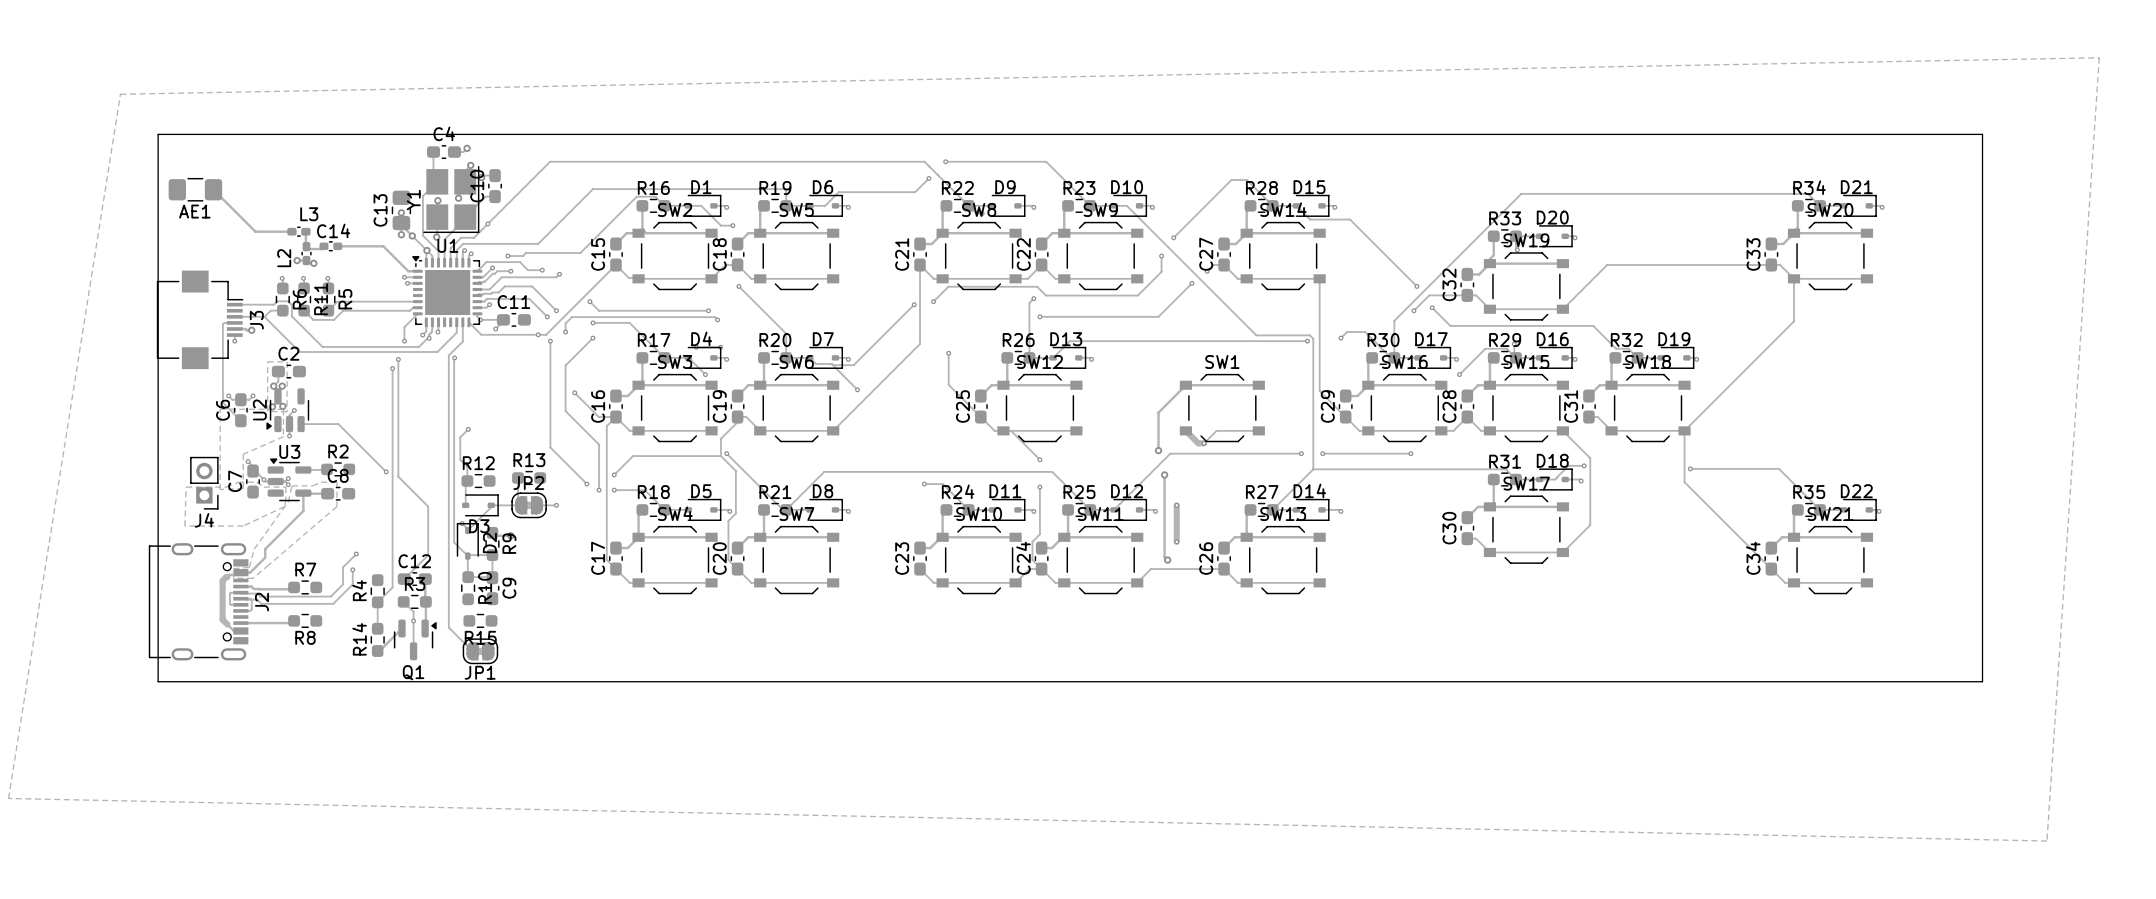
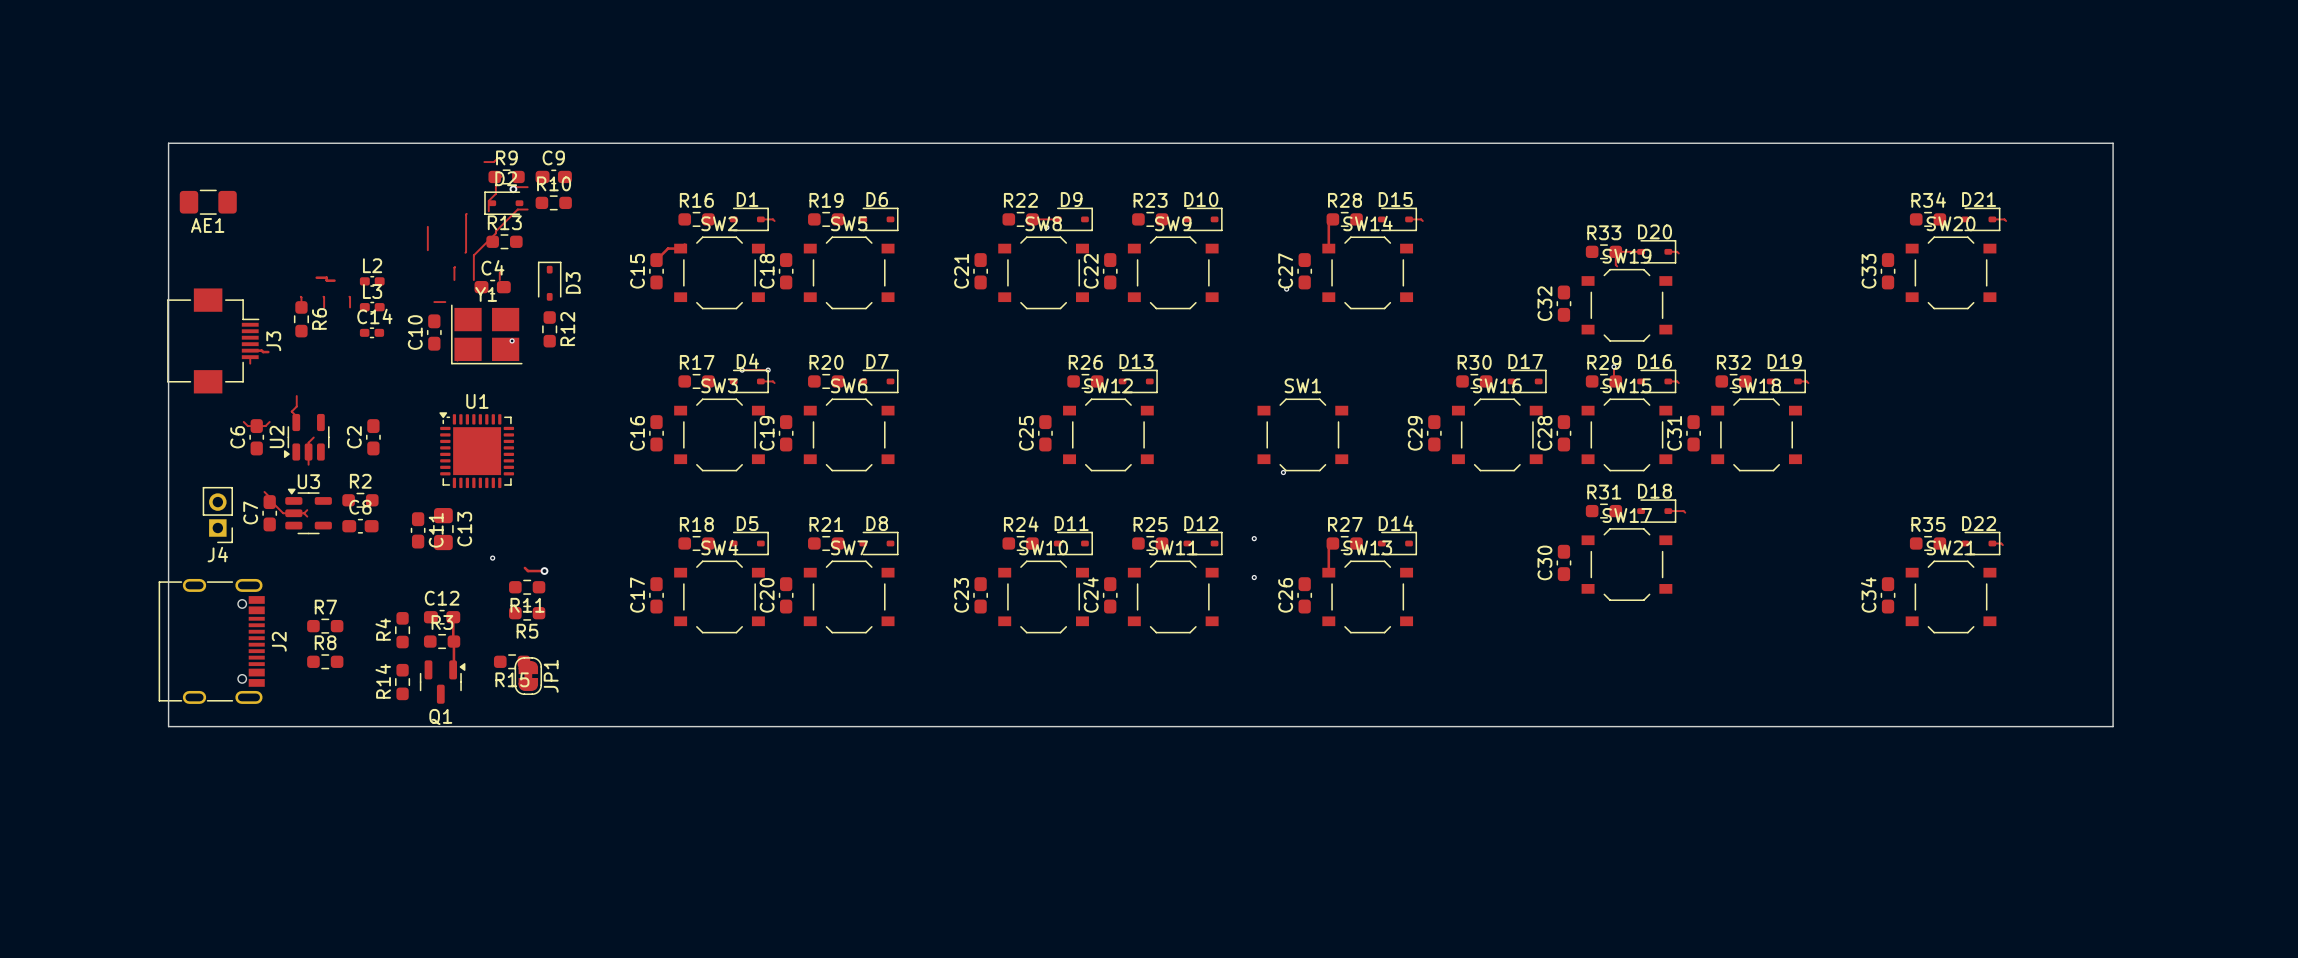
zone outline: (2099, 57) (120, 94) (8, 798) (2046, 841) (2099, 57) -> none
via: (467, 148) -> none
track: (433, 152) (433, 178) (437, 181) (422, 196) (422, 235) (438, 251) (438, 262) -> none
C4 position: (443, 152) -> (492, 287)
track: (945, 161) (1046, 161) (1090, 205) (1126, 205) (1256, 335) (1309, 335) (1313, 338) (1313, 469) -> none
via: (945, 161) -> none
via: (470, 165) -> none
track: (928, 178) (915, 192) (838, 192) (825, 205) (786, 205) (786, 190) (784, 189) (592, 189) (538, 243) (463, 243) (456, 250) (456, 262) -> none
via: (928, 178) -> none
C10 position: (495, 186) -> (434, 332)
track: (213, 189) (255, 231) (291, 231) -> none
via: (458, 198) -> none
Y1 rotation: 0° (451, 199) -> 90° clockwise (486, 334)
Y1 position: (451, 199) -> (486, 334)
via: (437, 200) -> none
track: (642, 205) (642, 229) (646, 233) (711, 233) -> none
track: (764, 205) (760, 209) (760, 233) -> none
track: (835, 205) (848, 207) -> none
track: (946, 205) (942, 209) (942, 233) -> none
track: (1017, 205) (1033, 207) -> none
track: (1068, 205) (1064, 209) (1064, 233) -> none
track: (1139, 205) (1152, 207) -> none
track: (1797, 205) (1797, 227) (1793, 233) -> none
track: (1843, 205) (1820, 205) (1808, 193) (1521, 193) (1394, 320) (1394, 357) -> none
via: (726, 207) -> none
via: (848, 207) -> none
via: (1033, 207) -> none
via: (1152, 207) -> none
via: (1334, 207) -> none
via: (1882, 207) -> none
C13 name position: C13 (380, 210) -> C13 (464, 529)
C13 position: (401, 210) -> (443, 529)
via: (401, 212) -> none
track: (982, 213) (976, 213) (924, 161) (550, 161) (474, 237) (461, 237) (450, 248) (450, 262) -> none
L3 name position: L3 (309, 214) -> L3 (372, 291)
via: (487, 223) -> none
track: (401, 225) (432, 256) (432, 262) -> none
track: (732, 225) (720, 225) (701, 205) (664, 205) (655, 196) (636, 196) (580, 252) (526, 252) (523, 256) (507, 256) -> none
via: (732, 225) -> none
L3 position: (298, 231) -> (372, 307)
track: (305, 231) (305, 244) (308, 249) (321, 249) (323, 246) -> none
track: (833, 233) (748, 233) (737, 244) -> none
track: (942, 233) (1015, 233) -> none
track: (942, 233) (931, 244) (920, 244) -> none
track: (1137, 233) (1052, 233) (1041, 244) -> none
track: (1319, 233) (1246, 233) (1235, 244) (1224, 244) -> none
track: (1793, 233) (1866, 233) -> none
track: (1793, 233) (1783, 244) (1771, 244) -> none
via: (401, 234) -> none
via: (412, 235) -> none
track: (1493, 236) (1493, 255) (1489, 259) (1489, 263) -> none
via: (436, 237) -> none
track: (1173, 237) (1231, 180) (1246, 180) (1272, 205) (1296, 205) (1310, 219) (1350, 219) (1416, 286) -> none
via: (1173, 237) -> none
via: (1575, 237) -> none
C14 position: (330, 246) -> (372, 332)
track: (337, 246) (383, 246) (408, 271) (417, 271) -> none
via: (1517, 249) -> none
via: (426, 250) -> none
track: (464, 250) (462, 252) (462, 262) -> none
via: (464, 250) -> none
L2 rotation: 0° (306, 253) -> 90° clockwise (372, 281)
L2 position: (306, 253) -> (372, 281)
via: (471, 253) -> none
via: (507, 256) -> none
track: (1161, 256) (1161, 271) (1137, 295) (1046, 295) (1037, 286) (948, 286) (933, 301) -> none
via: (1161, 256) -> none
via: (297, 260) -> none
via: (313, 263) -> none
track: (1489, 263) (1479, 274) (1467, 274) -> none
track: (1489, 263) (1562, 263) -> none
track: (492, 267) (483, 277) (477, 277) -> none
via: (492, 267) -> none
track: (542, 270) (528, 270) (519, 262) (486, 262) (477, 271) -> none
via: (542, 270) -> none
track: (510, 271) (497, 271) (484, 281) (477, 283) -> none
via: (510, 271) -> none
track: (1207, 271) (1213, 264) (1224, 264) (1237, 278) (1319, 278) (1319, 390) (1359, 430) (1453, 430) (1467, 417) (1481, 430) (1562, 430) (1590, 458) (1590, 525) (1562, 552) (1489, 552) (1476, 538) (1467, 538) -> none
track: (559, 274) (556, 277) (501, 277) (489, 289) (477, 289) -> none
via: (559, 274) -> none
track: (404, 277) (417, 277) -> none
via: (404, 277) -> none
via: (282, 278) -> none
via: (303, 278) -> none
via: (327, 278) -> none
track: (833, 278) (751, 278) (737, 264) (725, 264) (711, 278) (638, 278) (628, 277) (615, 264) (546, 334) (481, 334) (468, 322) -> none
track: (1137, 278) (1055, 278) (1041, 264) (1027, 278) (933, 278) (920, 264) (920, 344) (833, 430) (760, 430) (746, 417) (737, 417) (737, 422) (720, 438) (720, 456) -> none
track: (1793, 278) (1866, 278) -> none
track: (1793, 278) (1793, 321) (1684, 430) -> none
track: (1793, 278) (1780, 264) (1607, 264) (1562, 309) (1489, 309) (1476, 295) (1429, 295) (1413, 310) -> none
via: (407, 283) -> none
track: (1191, 283) (1158, 316) (1039, 316) -> none
via: (1191, 283) -> none
track: (738, 286) (786, 333) (786, 357) (809, 357) (816, 363) (831, 363) (857, 389) -> none
via: (738, 286) -> none
via: (1416, 286) -> none
U1 position: (447, 291) -> (476, 450)
track: (477, 295) (498, 292) (504, 286) (532, 286) (556, 310) -> none
track: (1033, 298) (1029, 302) (1029, 357) (1053, 357) (1069, 341) (1307, 341) -> none
via: (1033, 298) -> none
R11 rotation: 0° (304, 299) -> 90° clockwise (527, 587)
R11 position: (304, 299) -> (527, 587)
R5 rotation: 0° (328, 299) -> 90° clockwise (527, 613)
R5 position: (328, 299) -> (527, 613)
track: (417, 301) (337, 301) (328, 310) -> none
track: (477, 301) (484, 301) (487, 298) (529, 298) (547, 316) -> none
track: (589, 301) (599, 310) (708, 310) -> none
via: (589, 301) -> none
via: (933, 301) -> none
track: (234, 304) (273, 304) (277, 301) (288, 301) (291, 304) (291, 316) (322, 346) (419, 346) (429, 336) -> none
track: (489, 304) (486, 307) (477, 307) -> none
via: (489, 304) -> none
track: (914, 304) (853, 365) (832, 365) -> none
via: (914, 304) -> none
track: (417, 307) (412, 307) (409, 310) (343, 310) (333, 319) (313, 319) (304, 310) -> none
track: (1432, 307) (1450, 325) (1593, 325) (1616, 348) (1628, 348) (1637, 357) (1661, 357) -> none
via: (1432, 307) -> none
track: (282, 310) (270, 310) (264, 316) -> none
via: (556, 310) -> none
via: (708, 310) -> none
via: (1413, 310) -> none
track: (417, 313) (404, 327) (404, 341) -> none
track: (477, 313) (480, 319) (503, 319) (495, 329) -> none
track: (234, 316) (264, 316) -> none
track: (264, 316) (299, 351) (437, 351) (456, 332) (456, 322) -> none
via: (547, 316) -> none
via: (1039, 316) -> none
C11 rotation: 0° (513, 319) -> 90° clockwise (418, 530)
C11 position: (513, 319) -> (418, 530)
track: (717, 319) (714, 317) (571, 317) (565, 323) (565, 332) -> none
via: (717, 319) -> none
track: (234, 322) (222, 324) (222, 402) (240, 420) -> none
track: (426, 322) (426, 331) (422, 335) -> none
track: (462, 322) (462, 341) (448, 355) (448, 627) (472, 651) -> none
track: (592, 322) (629, 322) (664, 357) (688, 357) (705, 374) -> none
via: (592, 322) -> none
via: (495, 329) -> none
via: (251, 330) -> none
via: (437, 332) -> none
via: (565, 332) -> none
via: (538, 334) -> none
via: (422, 335) -> none
via: (429, 338) -> none
track: (592, 338) (565, 365) (565, 411) (599, 444) (599, 490) -> none
via: (592, 338) -> none
track: (1340, 338) (1347, 332) (1365, 332) (1391, 357) (1418, 357) -> none
via: (1340, 338) -> none
via: (234, 341) -> none
via: (404, 341) -> none
track: (550, 341) (550, 447) (586, 484) -> none
via: (550, 341) -> none
via: (1307, 341) -> none
C2 name position: C2 (288, 353) -> C2 (354, 437)
track: (948, 353) (948, 384) (994, 430) (1076, 430) -> none
via: (948, 353) -> none
track: (454, 357) (454, 542) (467, 556) -> none
via: (454, 357) -> none
track: (642, 357) (642, 381) (627, 396) (615, 396) -> none
track: (764, 357) (764, 381) (760, 385) -> none
track: (835, 357) (848, 359) -> none
track: (1007, 357) (1007, 381) (1003, 385) -> none
track: (1078, 357) (1091, 359) -> none
track: (1372, 357) (1368, 361) (1368, 385) -> none
track: (1443, 357) (1456, 359) -> none
track: (1493, 357) (1489, 361) (1489, 385) -> none
track: (1539, 357) (1515, 357) (1506, 348) (1485, 348) (1459, 374) -> none
track: (1615, 357) (1611, 361) (1611, 385) -> none
track: (398, 359) (398, 476) (428, 506) (428, 555) (404, 579) -> none
via: (398, 359) -> none
via: (726, 359) -> none
via: (848, 359) -> none
via: (1091, 359) -> none
via: (1456, 359) -> none
via: (1575, 359) -> none
via: (1696, 359) -> none
zone outline: (267, 361) (287, 361) (287, 411) (267, 411) (267, 361) -> none
track: (392, 368) (392, 587) (377, 602) (377, 628) -> none
via: (392, 368) -> none
C2 rotation: 0° (288, 371) -> 90° clockwise (373, 437)
C2 position: (288, 371) -> (373, 437)
via: (705, 374) -> none
via: (1459, 374) -> none
track: (638, 385) (711, 385) -> none
track: (833, 385) (748, 385) (737, 396) -> none
track: (1076, 385) (991, 385) (980, 396) -> none
track: (1258, 385) (1185, 385) (1158, 412) (1158, 450) -> none
track: (1368, 385) (1441, 385) -> none
track: (1368, 385) (1357, 396) (1345, 396) -> none
track: (1562, 385) (1478, 385) (1467, 396) -> none
track: (1684, 385) (1599, 385) (1588, 396) -> none
via: (273, 386) -> none
via: (282, 386) -> none
via: (857, 389) -> none
track: (574, 392) (598, 417) (615, 417) -> none
via: (574, 392) -> none
via: (228, 395) -> none
via: (253, 395) -> none
via: (272, 406) -> none
via: (282, 406) -> none
zone outline: (220, 409) (220, 489) (243, 488) (243, 454) (283, 436) (283, 409) (220, 409) -> none
via: (294, 410) -> none
track: (615, 417) (629, 430) (711, 430) -> none
track: (615, 417) (606, 426) (606, 559) (629, 582) (711, 582) -> none
track: (1588, 417) (1597, 417) (1611, 430) (1684, 430) -> none
track: (301, 424) (338, 424) (386, 471) -> none
track: (468, 429) (460, 437) (460, 459) (467, 466) (465, 505) -> none
via: (468, 429) -> none
track: (1011, 430) (1039, 459) -> none
track: (1185, 430) (1198, 443) (1204, 443) (1216, 430) (1258, 430) -> none
track: (1684, 430) (1684, 482) (1785, 582) (1866, 582) -> none
via: (289, 436) -> none
via: (1158, 450) -> none
track: (726, 453) (783, 509) (809, 509) -> none
via: (726, 453) -> none
track: (1301, 453) (1170, 453) (1113, 509) (1090, 509) (1052, 471) (824, 471) (786, 509) -> none
via: (1301, 453) -> none
track: (1322, 453) (1410, 453) -> none
via: (1322, 453) -> none
via: (1410, 453) -> none
track: (720, 456) (735, 470) (735, 513) (728, 520) (728, 559) (751, 582) (833, 582) -> none
track: (720, 456) (633, 456) (614, 474) -> none
via: (1039, 459) -> none
via: (248, 461) -> none
track: (1584, 465) (1568, 465) (1555, 479) (1515, 479) (1505, 469) (1313, 469) -> none
via: (1584, 465) -> none
track: (1690, 468) (1778, 468) (1820, 509) (1843, 509) -> none
via: (1690, 468) -> none
track: (327, 469) (303, 469) -> none
track: (1313, 469) (1272, 509) (1296, 509) -> none
via: (386, 471) -> none
via: (614, 474) -> none
track: (1164, 474) (1164, 557) (1167, 560) -> none
via: (1164, 474) -> none
track: (518, 477) (518, 502) (521, 505) (491, 505) (467, 530) (462, 523) -> none
R13 position: (529, 477) -> (504, 241)
via: (288, 478) -> none
via: (263, 479) -> none
track: (1493, 479) (1493, 503) (1489, 506) -> none
R12 rotation: 0° (478, 481) -> 90° clockwise (549, 329)
R12 position: (478, 481) -> (549, 329)
via: (1581, 481) -> none
zone outline: (238, 482) (256, 482) (263, 487) (285, 487) (284, 506) (243, 526) (184, 526) (186, 487) (226, 487) (238, 482) -> none
zone outline: (321, 482) (312, 485) (291, 485) (288, 501) (254, 549) (249, 567) (233, 568) (233, 578) (253, 578) (336, 506) (336, 482) (321, 482) -> none
via: (288, 484) -> none
via: (586, 484) -> none
track: (924, 484) (942, 484) (968, 509) (992, 509) -> none
via: (924, 484) -> none
track: (1039, 487) (1039, 534) (1032, 541) (1032, 559) (1055, 582) (1137, 582) (1151, 569) (1224, 569) (1237, 582) (1319, 582) -> none
via: (1039, 487) -> none
via: (599, 490) -> none
track: (614, 490) (644, 490) (664, 509) (688, 509) -> none
via: (614, 490) -> none
track: (327, 493) (303, 493) (303, 510) (265, 549) (265, 557) (250, 572) (229, 574) (222, 580) (222, 619) (233, 630) (240, 630) -> none
D3 rotation: 0° (480, 505) -> 90° counterclockwise (549, 281)
D3 position: (480, 505) -> (549, 281)
JP2: (529, 505) -> none
track: (537, 505) (556, 505) -> none
via: (556, 505) -> none
track: (1176, 505) (1176, 541) -> none
track: (1562, 506) (1478, 506) (1467, 517) -> none
track: (642, 509) (638, 513) (638, 537) -> none
track: (713, 509) (729, 511) -> none
track: (764, 509) (764, 533) (760, 537) -> none
track: (835, 509) (848, 511) -> none
track: (946, 509) (942, 513) (942, 537) -> none
track: (1017, 509) (1033, 511) -> none
track: (1068, 509) (1068, 533) (1064, 537) -> none
track: (1139, 509) (1155, 511) -> none
track: (1321, 509) (1340, 511) -> none
track: (1797, 509) (1793, 513) (1793, 537) -> none
via: (729, 511) -> none
via: (848, 511) -> none
via: (1033, 511) -> none
via: (1155, 511) -> none
via: (1340, 511) -> none
via: (1879, 511) -> none
track: (638, 537) (711, 537) -> none
track: (638, 537) (627, 548) (615, 548) -> none
track: (833, 537) (748, 537) (737, 548) -> none
track: (1015, 537) (941, 537) (930, 548) (920, 548) -> none
track: (1137, 537) (1062, 537) (1051, 548) (1041, 548) -> none
track: (1319, 537) (1234, 537) (1224, 548) -> none
track: (1866, 537) (1782, 537) (1771, 548) -> none
D2 rotation: 0° (467, 541) -> 90° counterclockwise (503, 203)
D2 position: (467, 541) -> (503, 203)
R9 rotation: 0° (492, 543) -> 90° clockwise (506, 176)
R9 position: (492, 543) -> (506, 176)
R9 name position: R9 (509, 543) -> R9 (506, 157)
track: (356, 554) (343, 567) (343, 584) (330, 596) (260, 596) (257, 593) (230, 592) (229, 603) (240, 604) -> none
via: (356, 554) -> none
track: (467, 556) (492, 555) (492, 577) (468, 577) (467, 556) -> none
via: (1167, 560) -> none
track: (352, 569) (352, 584) (333, 603) (261, 603) (257, 599) (246, 598) -> none
via: (352, 569) -> none
track: (920, 569) (933, 582) (1015, 582) (1029, 569) (1041, 569) -> none
track: (240, 586) (251, 586) (253, 589) (259, 589) (292, 589) (294, 587) -> none
R10 name position: R10 (485, 587) -> R10 (554, 183)
R10 rotation: 0° (468, 588) -> 90° clockwise (553, 202)
R10 position: (468, 588) -> (553, 202)
C9 rotation: 0° (492, 588) -> 90° clockwise (553, 176)
C9 position: (492, 588) -> (553, 176)
C9 name position: C9 (509, 588) -> C9 (553, 157)
track: (240, 598) (251, 599) (251, 609) (240, 610) -> none
track: (403, 601) (413, 611) (413, 651) -> none
track: (294, 620) (291, 623) (240, 623) -> none
via: (413, 620) -> none
track: (402, 628) (377, 650) -> none
R8 name position: R8 (305, 637) -> R8 (325, 642)
JP1 rotation: 0° (480, 651) -> 90° clockwise (528, 676)
JP1 position: (480, 651) -> (528, 676)
JP1 name position: JP1 (480, 672) -> JP1 (551, 676)

